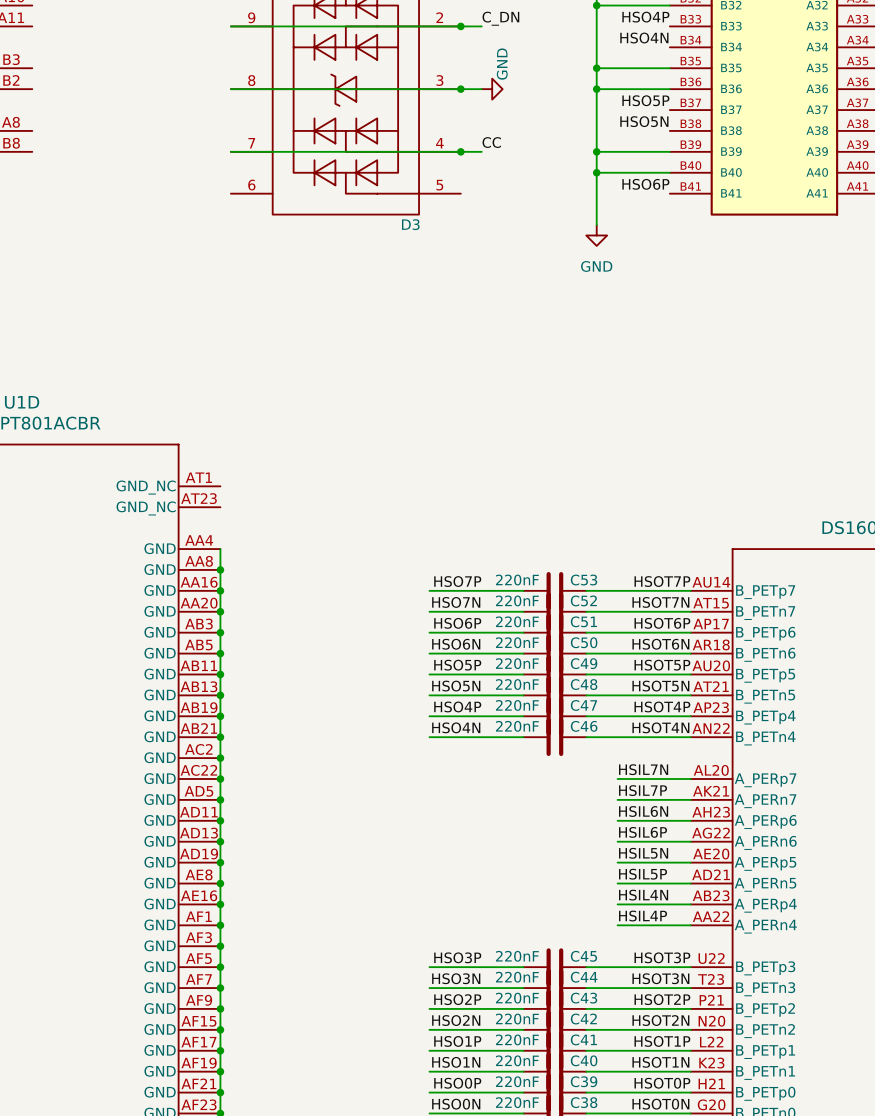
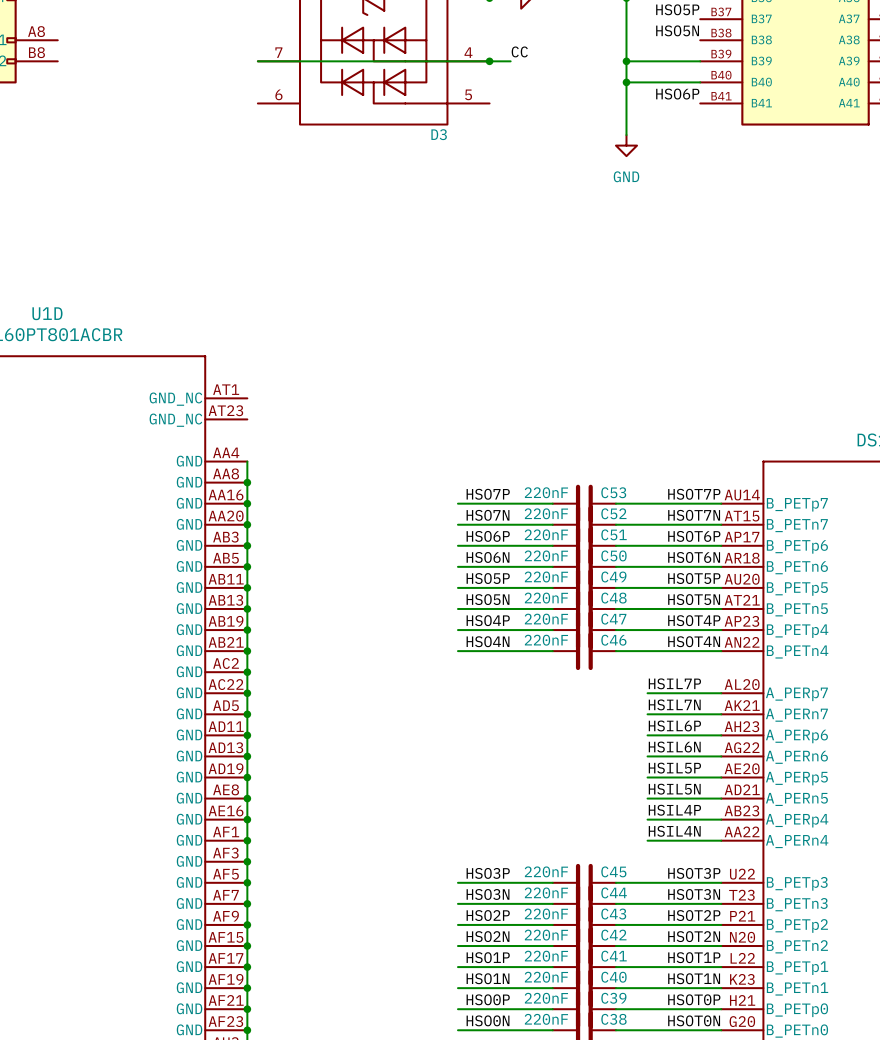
label: HSIL7N (643, 769) -> HSIL7P (674, 683)
label: HSIL7P (643, 790) -> HSIL7N (674, 704)
label: HSIL6N (643, 811) -> HSIL6P (674, 725)
label: HSIL6P (643, 832) -> HSIL6N (674, 747)
label: HSIL5N (643, 853) -> HSIL5P (674, 768)
label: HSIL5P (643, 874) -> HSIL5N (674, 789)
label: HSIL4N (643, 895) -> HSIL4P (674, 810)
label: HSIL4P (643, 916) -> HSIL4N (674, 831)

